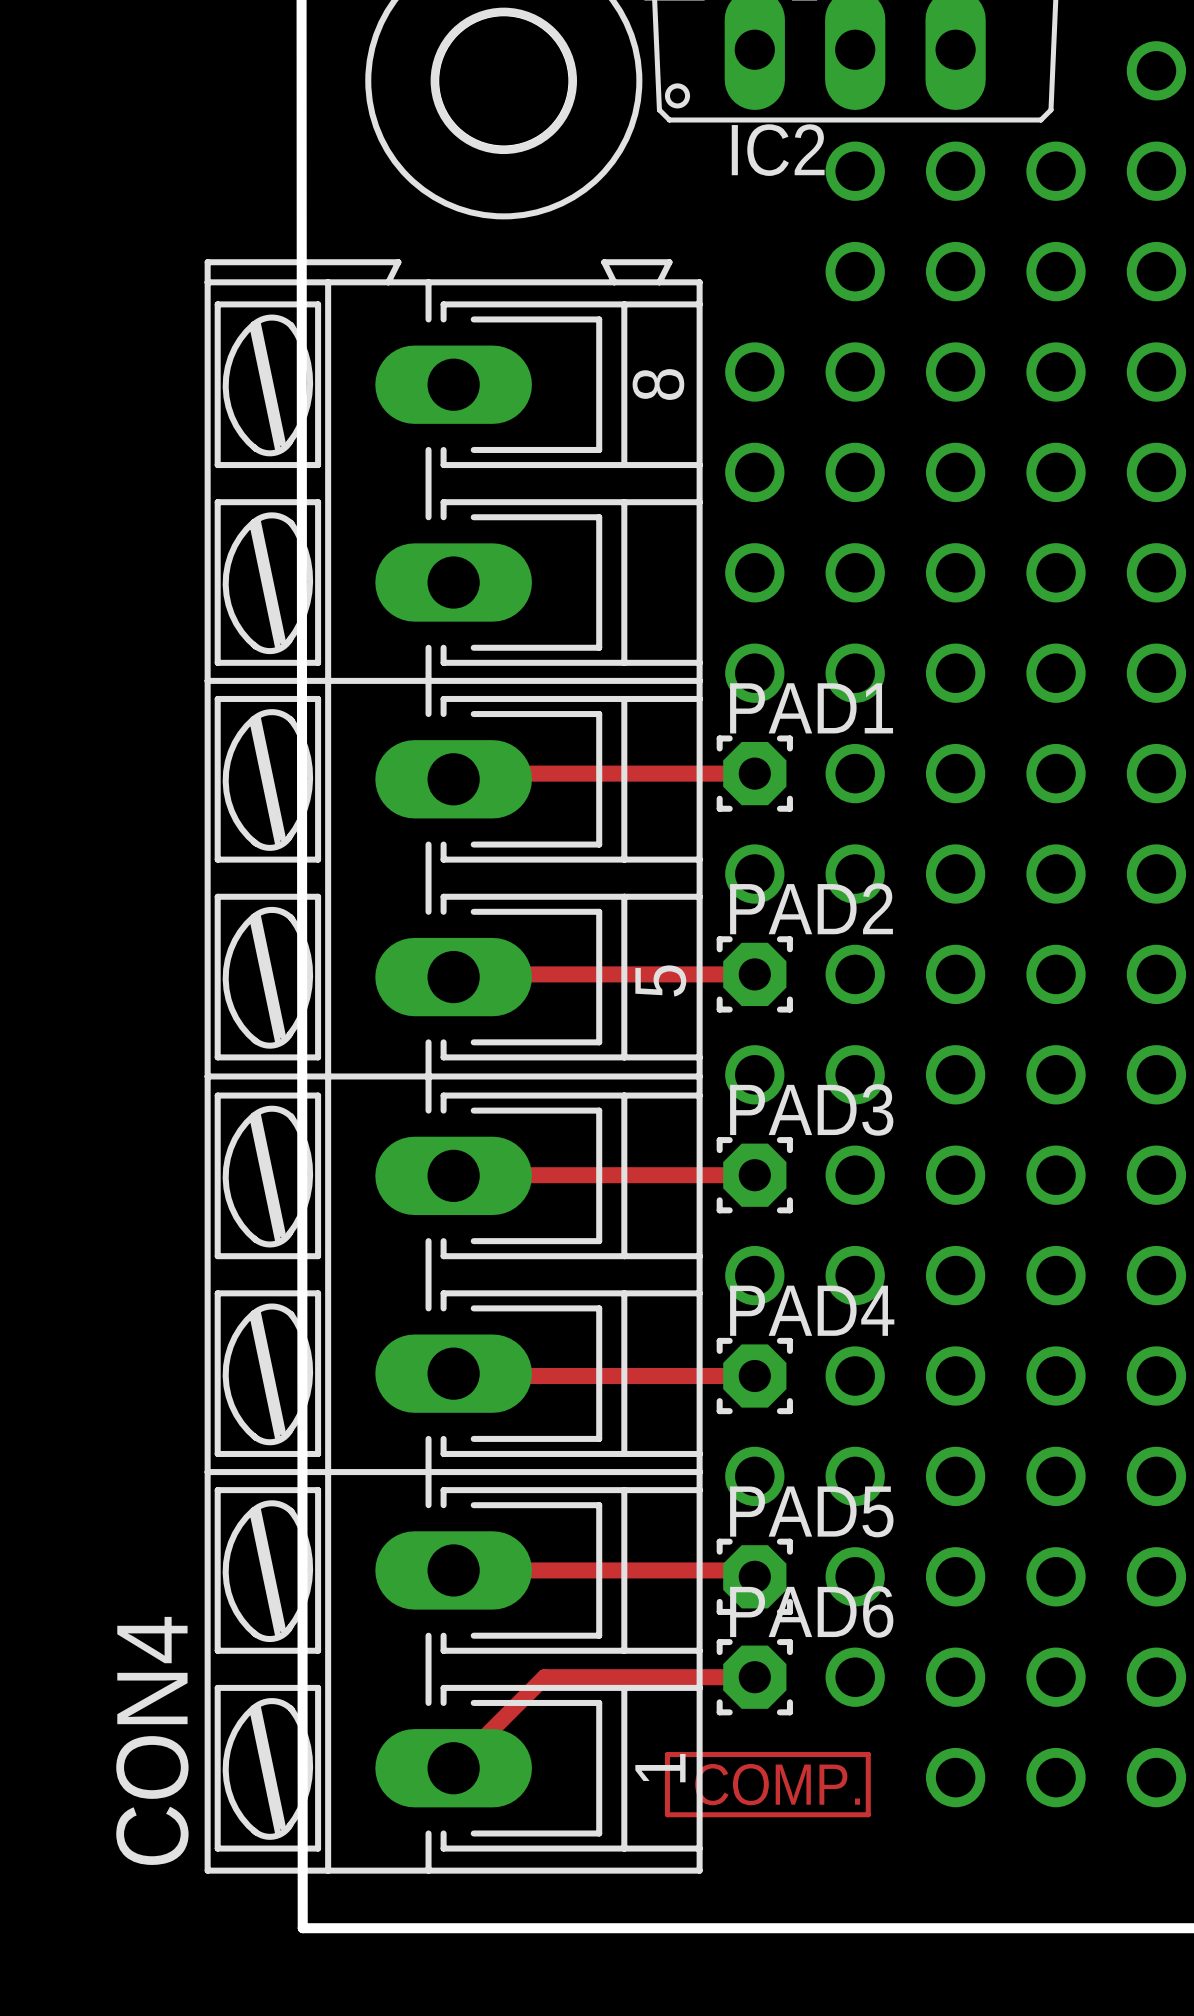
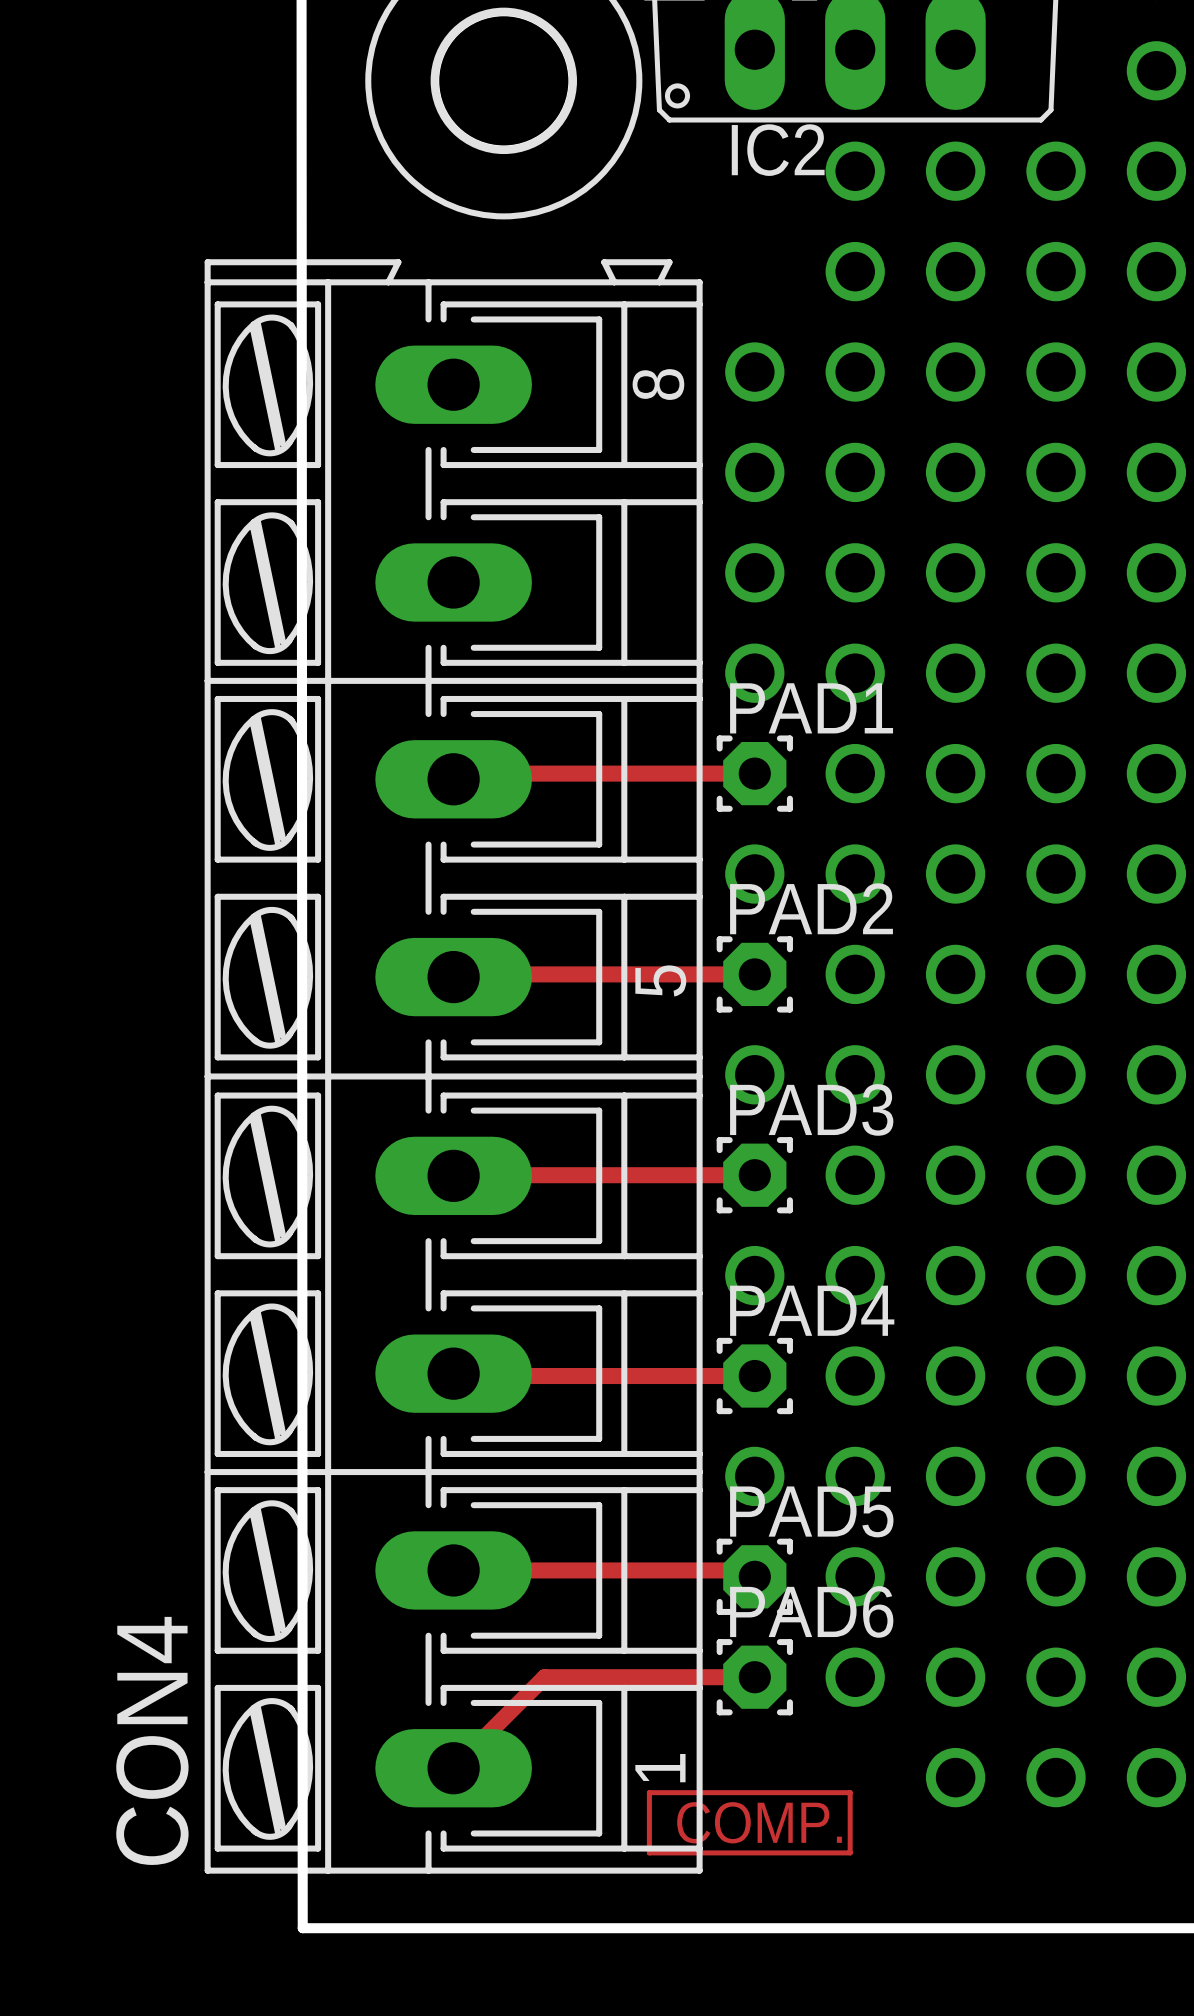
drawing position: (767, 1784) -> (749, 1822)

